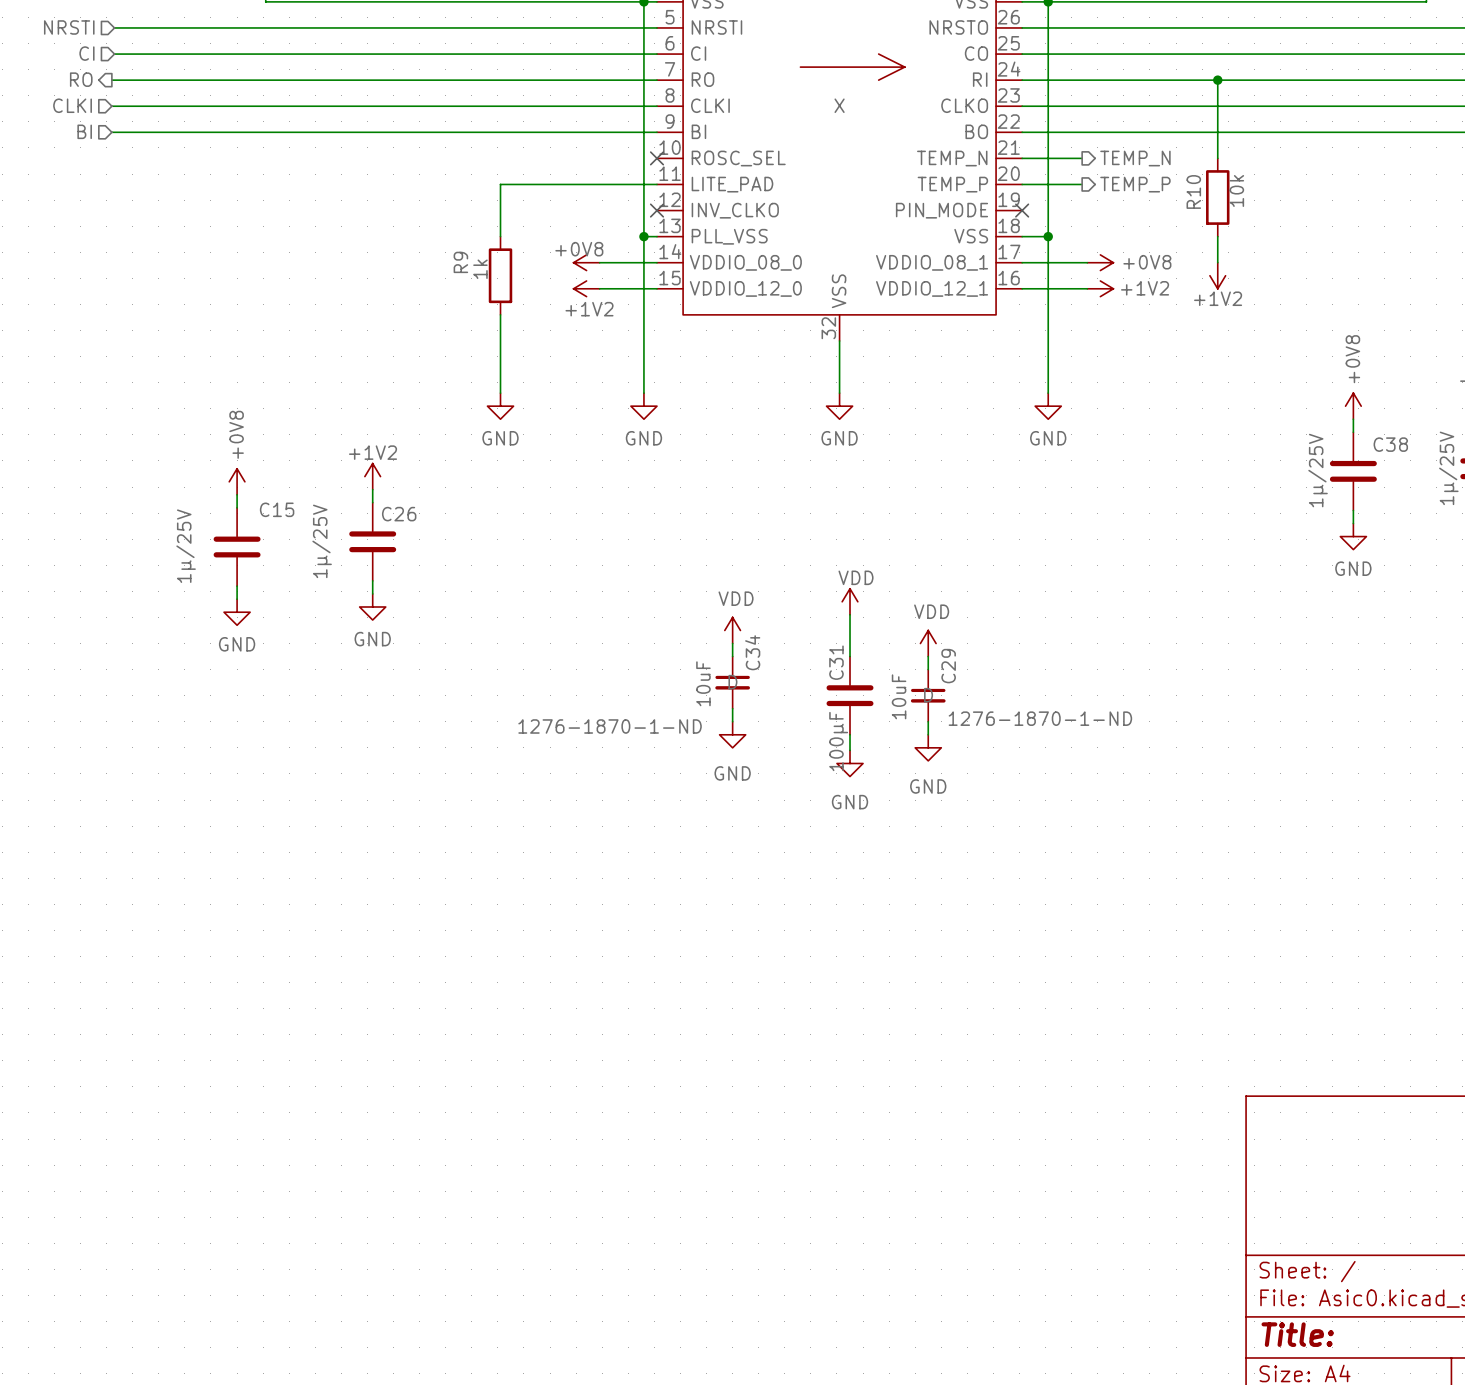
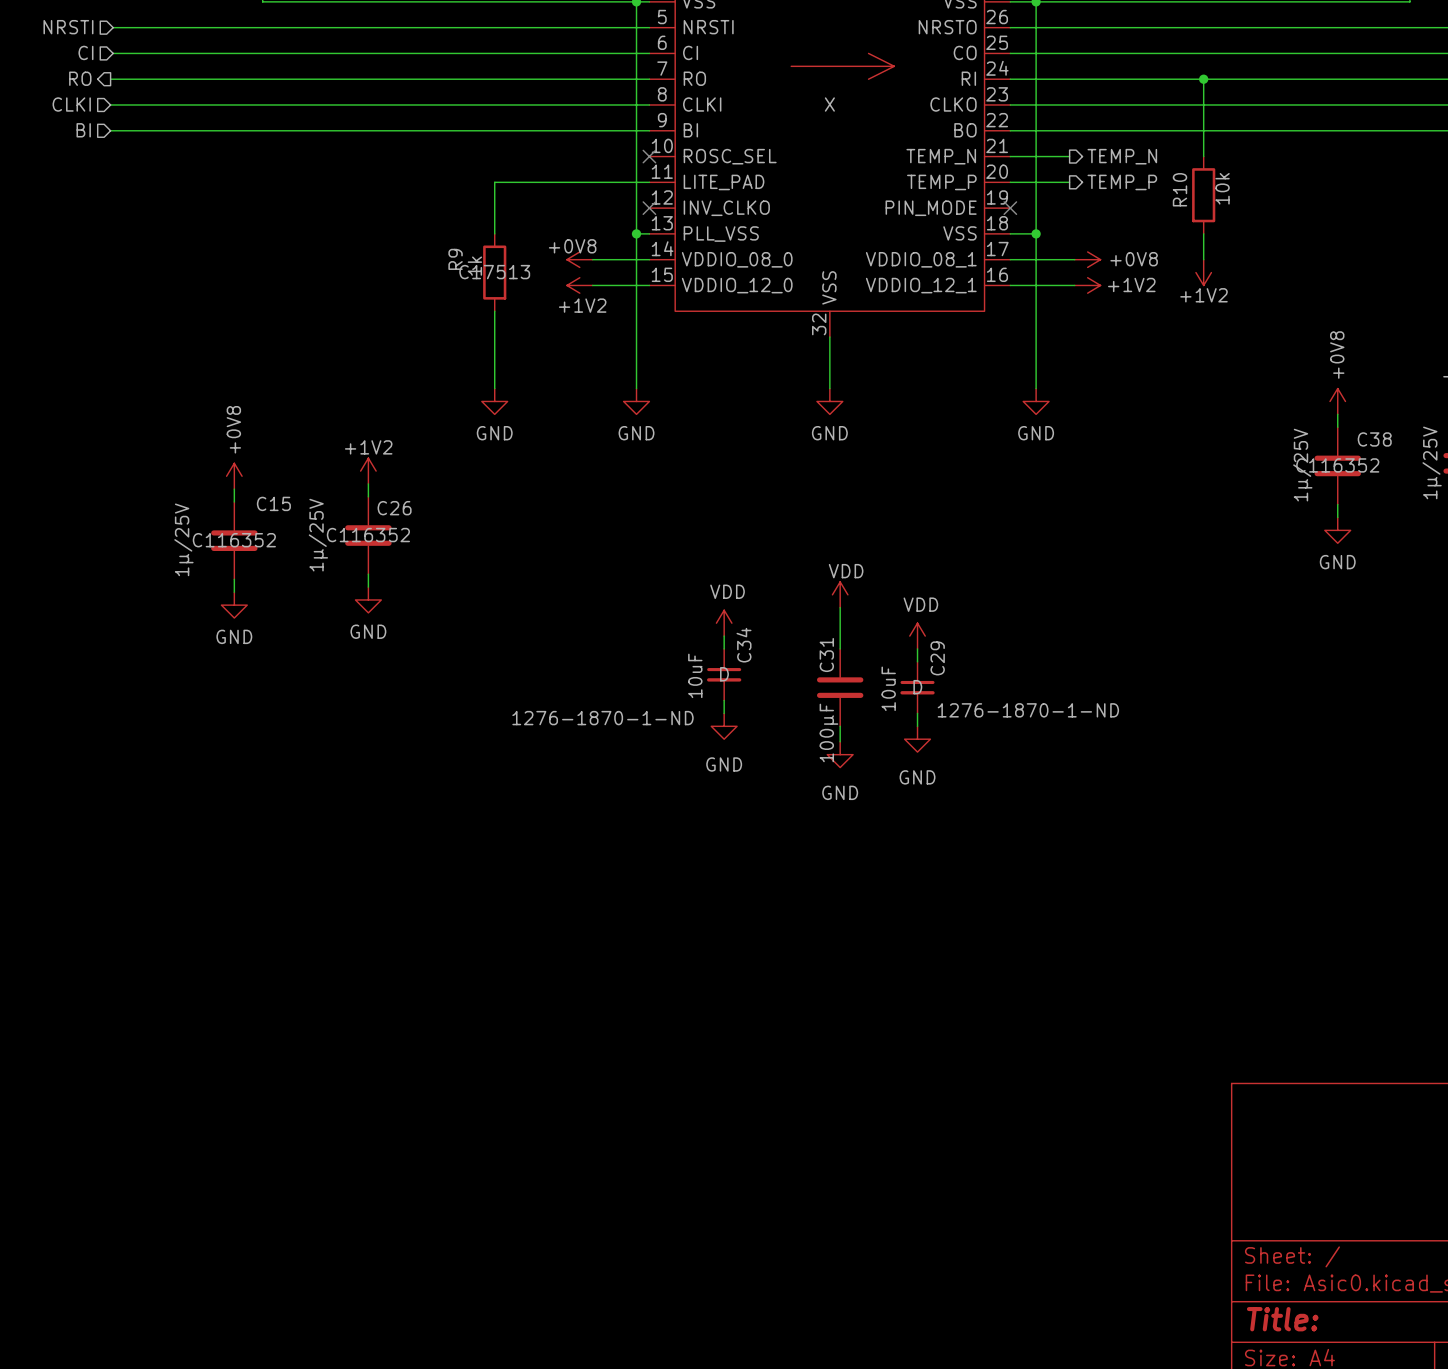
R9 text: none -> C17513 (494, 272)
C38 text: none -> C116352 (1337, 465)
C26 text: none -> C116352 (368, 535)
C15 text: none -> C116352 (234, 540)

